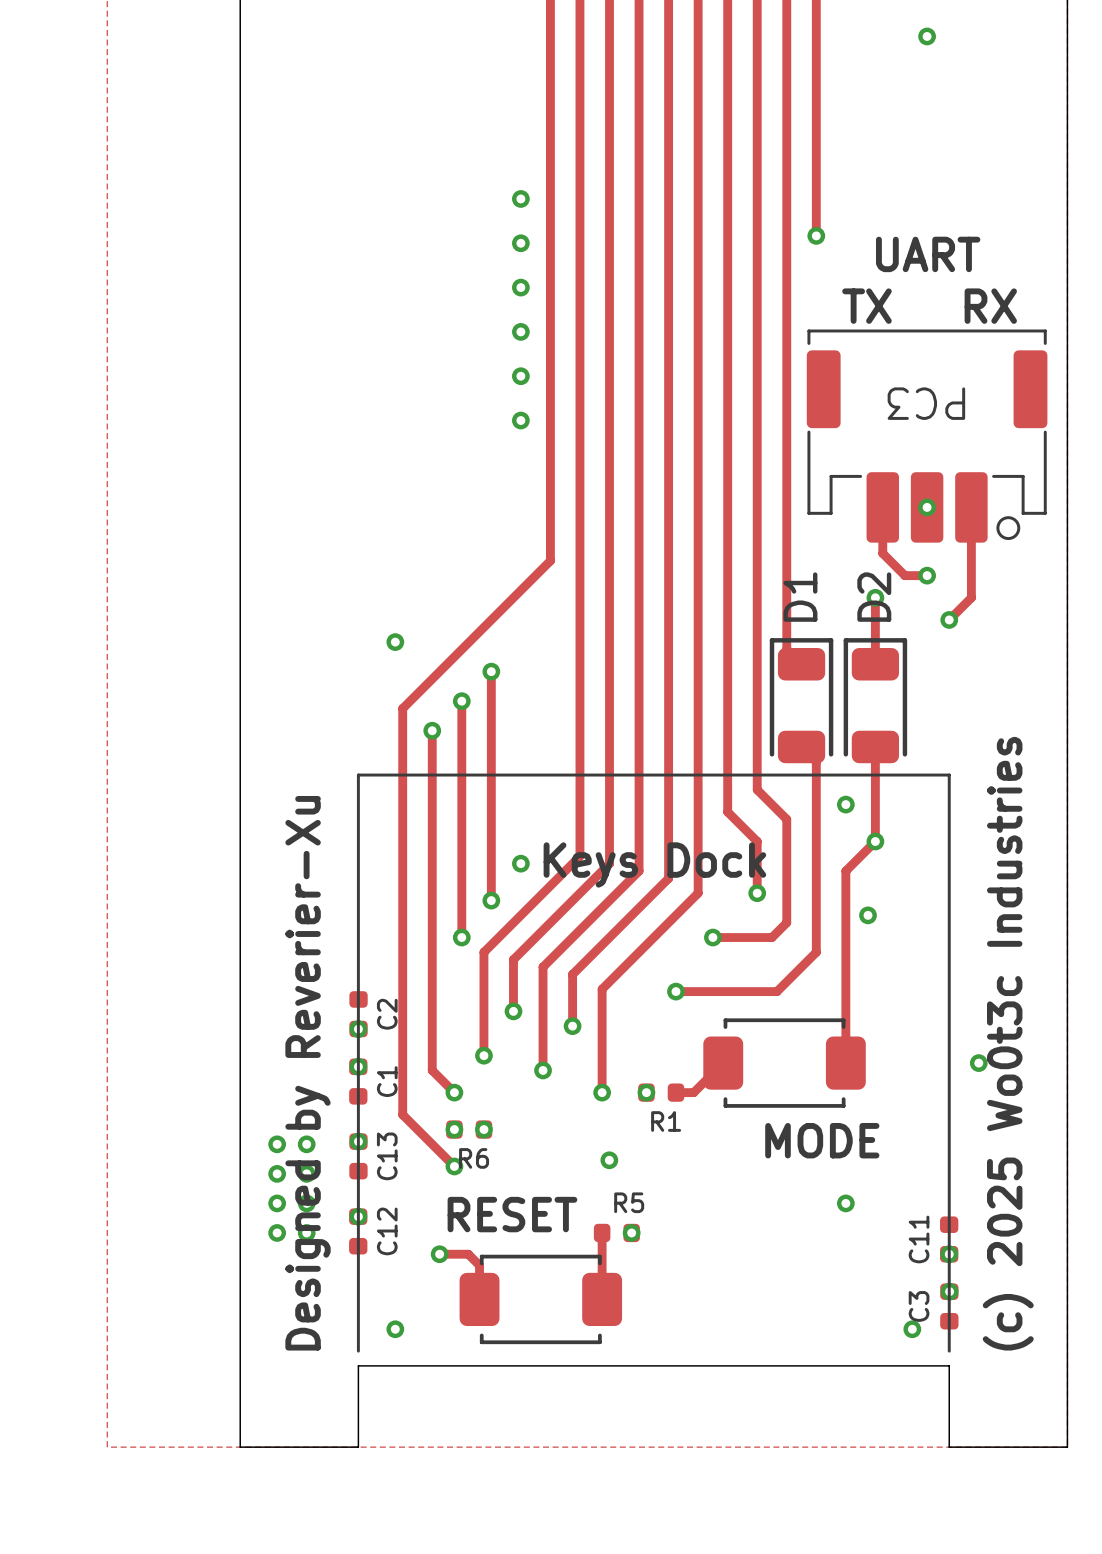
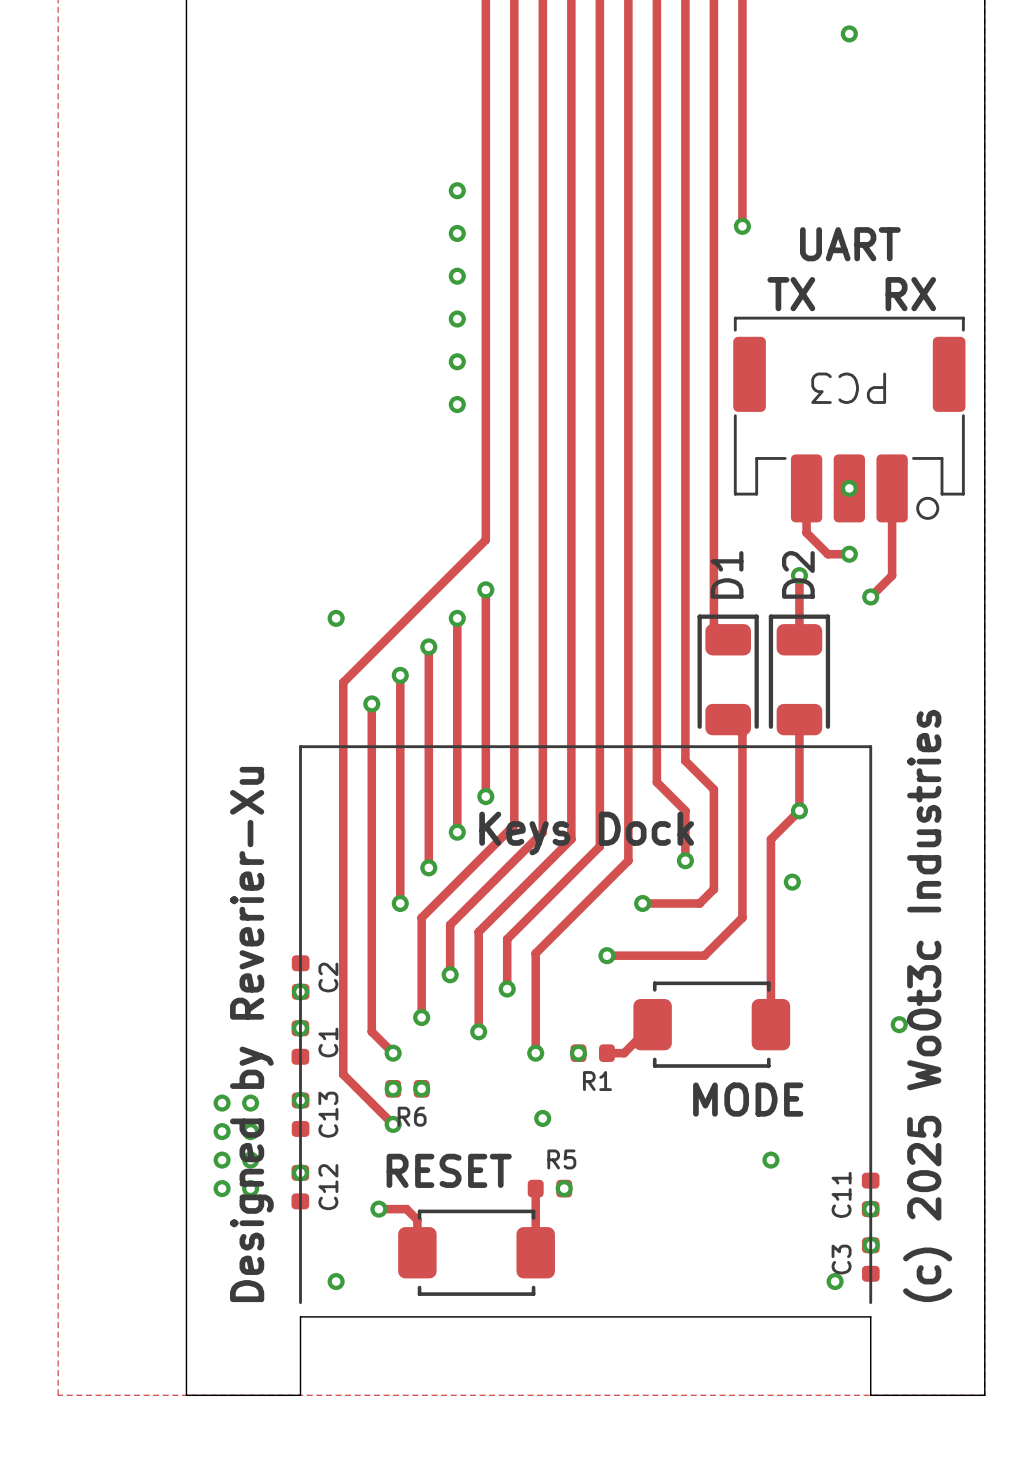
track: none -> (485, 589) (485, 796)
via: none -> (485, 589)
track: none -> (457, 618) (457, 832)
via: none -> (457, 618)
via: (845, 804) -> none
via: none -> (485, 796)

